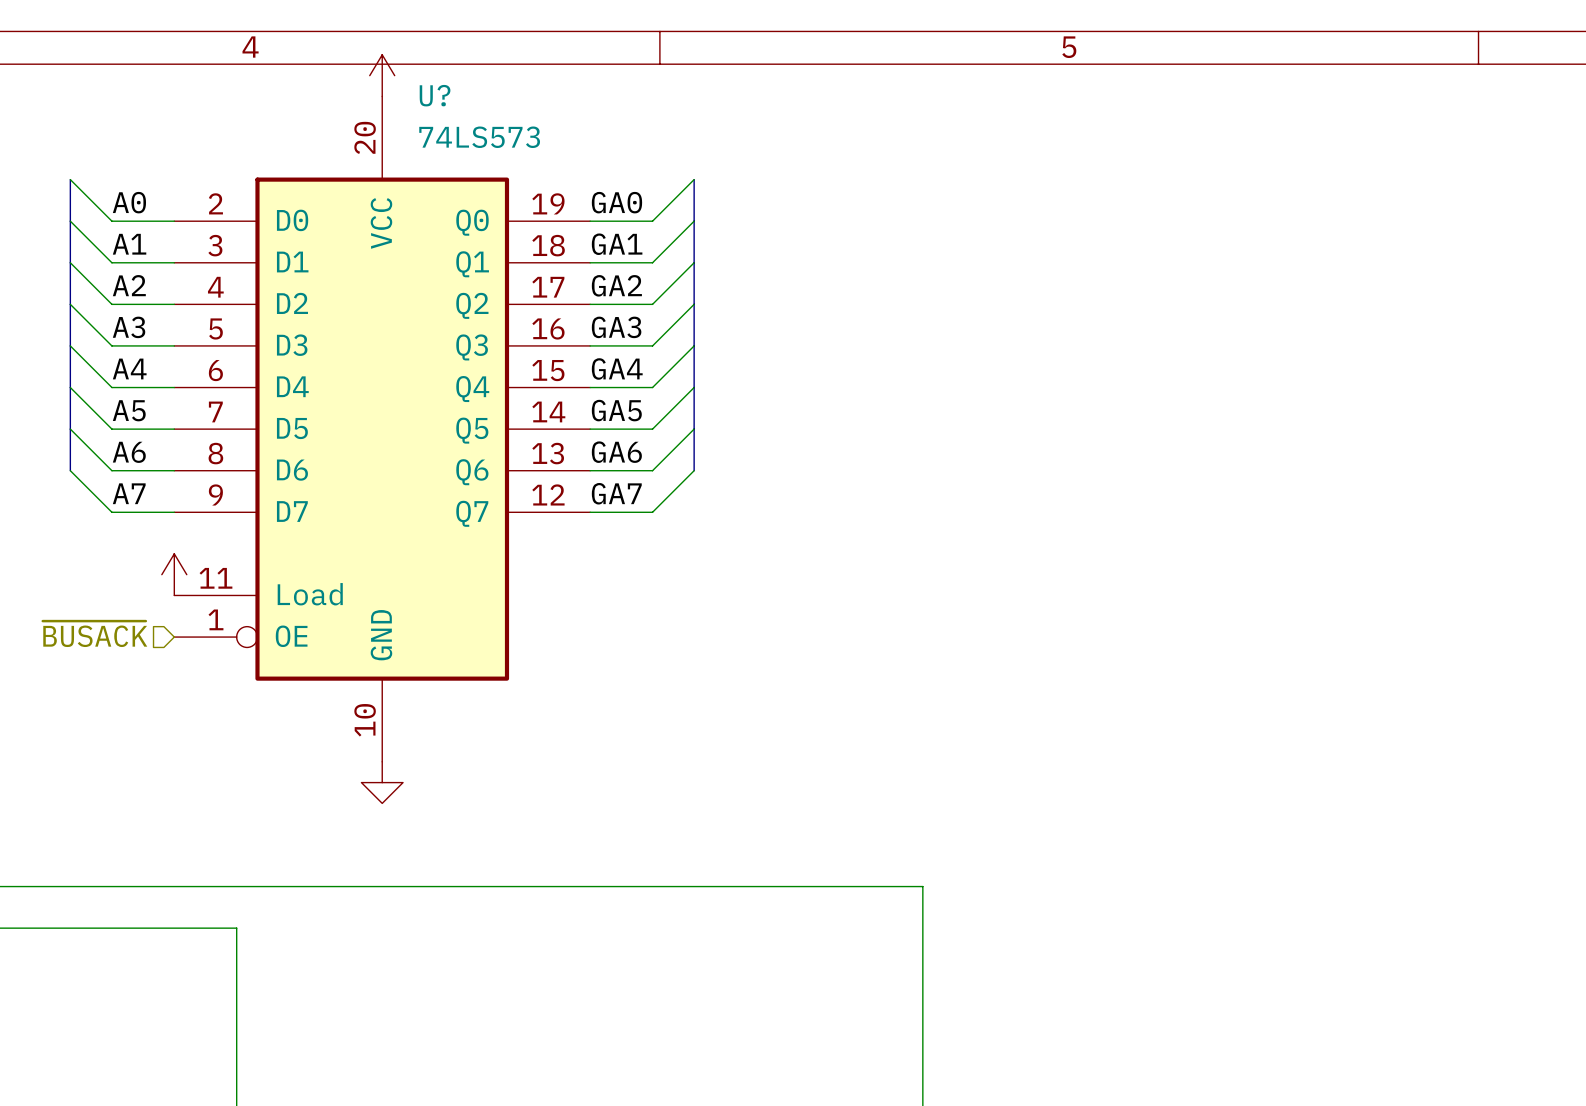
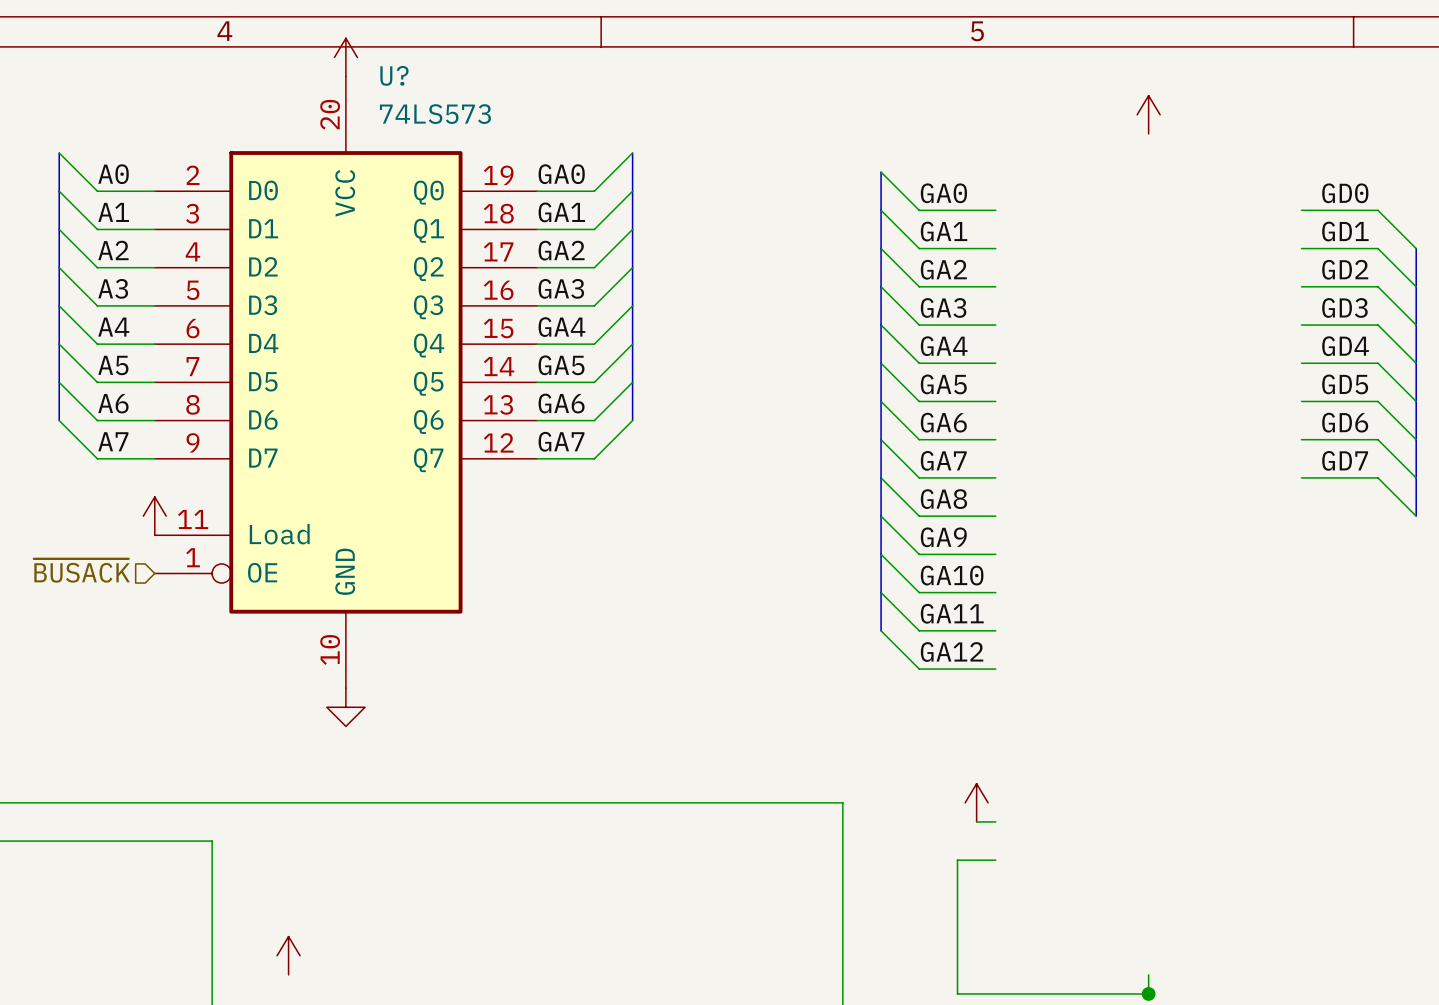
power symbol: none -> (1148, 114)
wire: none -> (881, 172) (919, 210) (995, 210)
bus: none -> (881, 172) (881, 630)
label: none -> GA0 (943, 193)
label: none -> GD0 (1345, 193)
wire: none -> (881, 210) (919, 248) (995, 248)
wire: none -> (1301, 210) (1377, 210) (1416, 248)
label: none -> GA1 (944, 231)
label: none -> GD1 (1345, 231)
wire: none -> (881, 248) (919, 286) (995, 286)
wire: none -> (1301, 248) (1377, 248) (1416, 286)
bus: none -> (1416, 248) (1416, 516)
label: none -> GA2 (943, 269)
label: none -> GD2 (1345, 269)
wire: none -> (881, 286) (919, 325) (995, 325)
wire: none -> (1301, 286) (1377, 286) (1416, 325)
label: none -> GA3 (943, 307)
label: none -> GD3 (1344, 307)
wire: none -> (881, 325) (919, 363) (995, 363)
wire: none -> (1301, 325) (1377, 325) (1416, 363)
label: none -> GA4 (944, 346)
label: none -> GD4 (1345, 346)
wire: none -> (881, 363) (919, 401) (995, 401)
wire: none -> (1301, 363) (1377, 363) (1416, 401)
label: none -> GA5 (943, 384)
label: none -> GD5 (1345, 384)
wire: none -> (881, 401) (919, 439) (995, 439)
wire: none -> (1301, 401) (1377, 401) (1416, 439)
label: none -> GA6 (943, 422)
label: none -> GD6 (1345, 422)
wire: none -> (881, 439) (919, 477) (995, 477)
wire: none -> (1301, 439) (1377, 439) (1416, 477)
label: none -> GA7 (943, 460)
label: none -> GD7 (1345, 460)
wire: none -> (881, 477) (919, 516) (995, 516)
wire: none -> (1301, 477) (1377, 477) (1416, 516)
label: none -> GA8 (943, 499)
wire: none -> (881, 516) (919, 554) (995, 554)
label: none -> GA9 (943, 537)
wire: none -> (881, 554) (919, 592) (995, 592)
label: none -> GA10 (952, 575)
wire: none -> (881, 592) (919, 630) (995, 630)
label: none -> GA11 (952, 613)
wire: none -> (881, 630) (919, 669) (995, 669)
label: none -> GA12 (952, 652)
power symbol: none -> (976, 802)
wire: none -> (976, 821) (995, 821)
wire: none -> (995, 860) (957, 860) (957, 993) (1148, 993) (1148, 974)
power symbol: none -> (288, 955)
junction: none -> (1148, 993)

